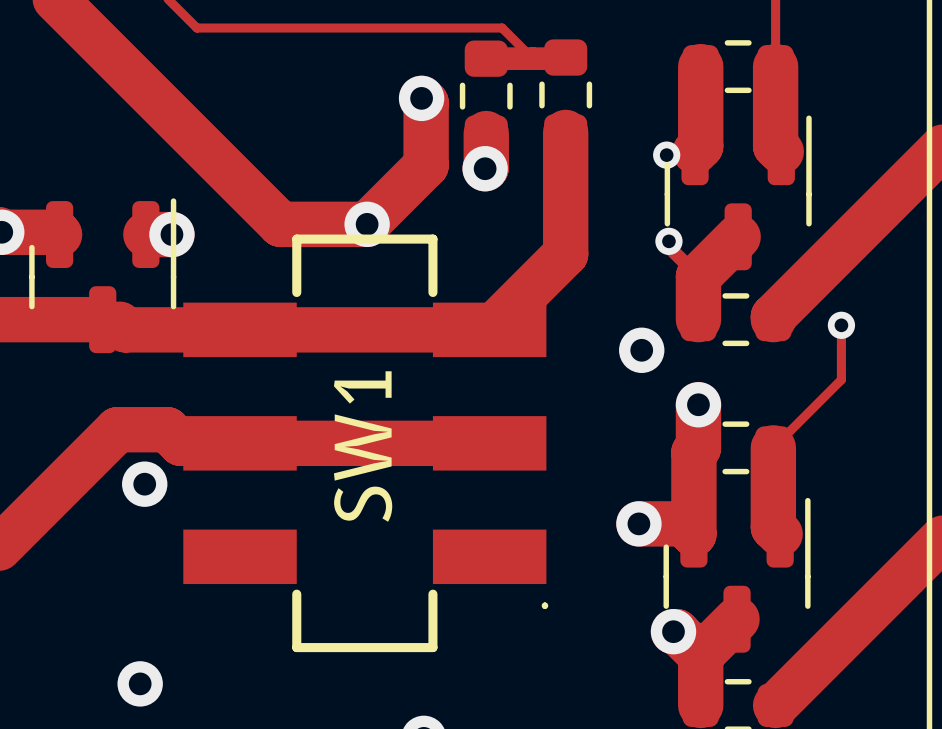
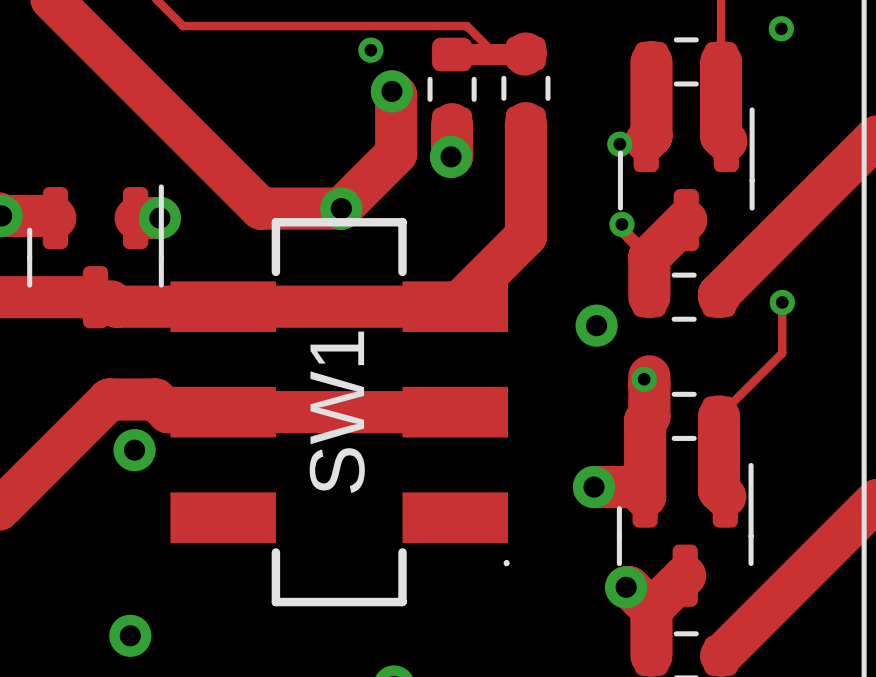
via: none -> (781, 28)
via: none -> (370, 50)
via size: [675, 382, 722, 428] -> [631, 366, 657, 392]

